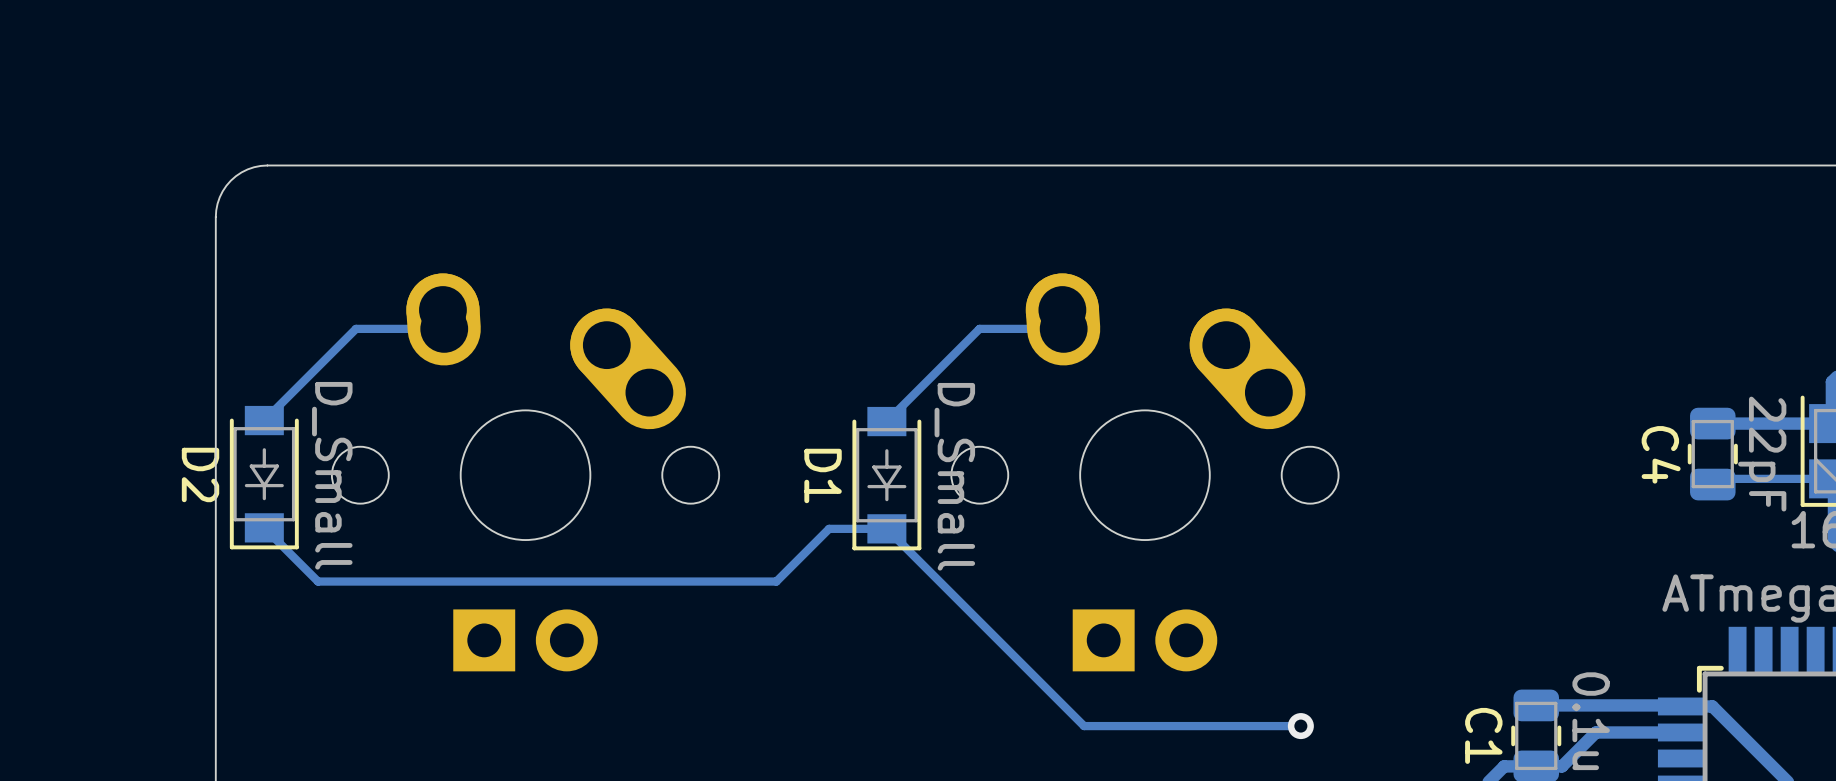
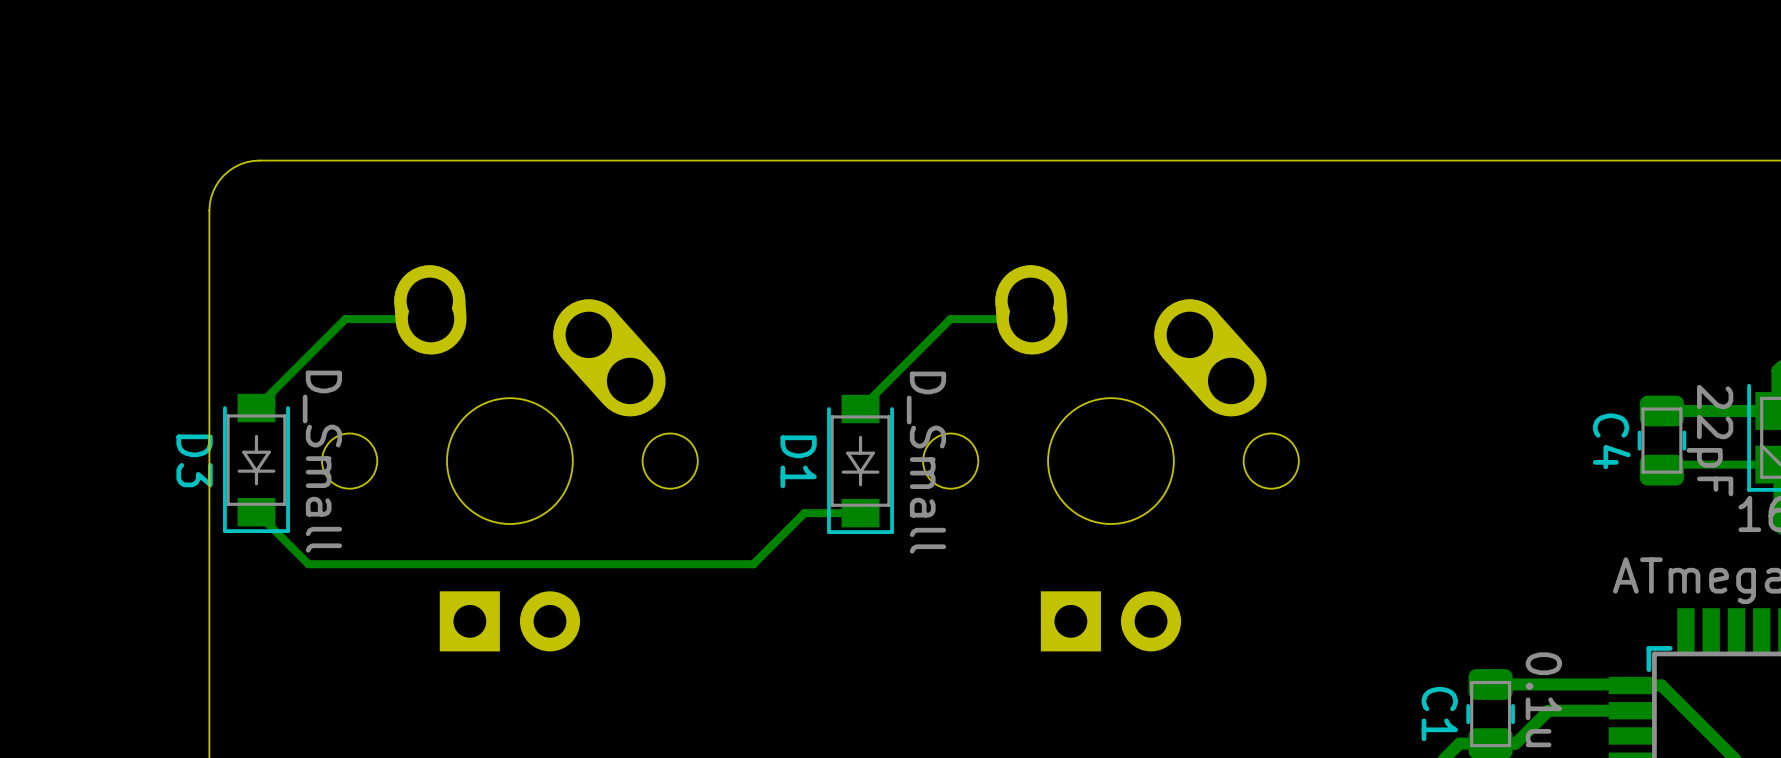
D2 name: D2 (200, 474) -> D3 (194, 460)
track: (886, 528) (1084, 726) (1300, 726) -> none
via: (1300, 726) -> none

